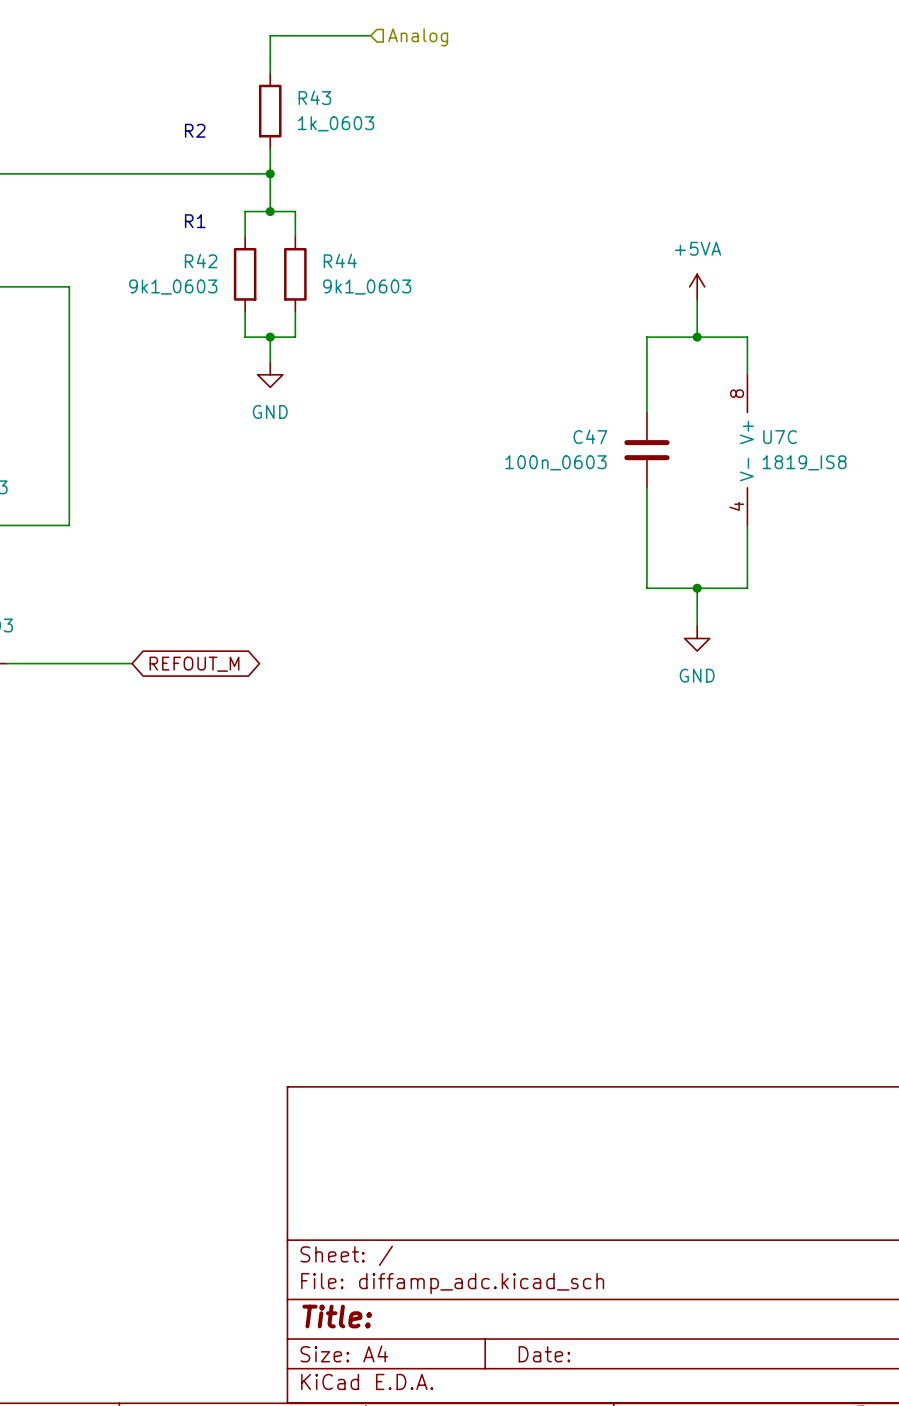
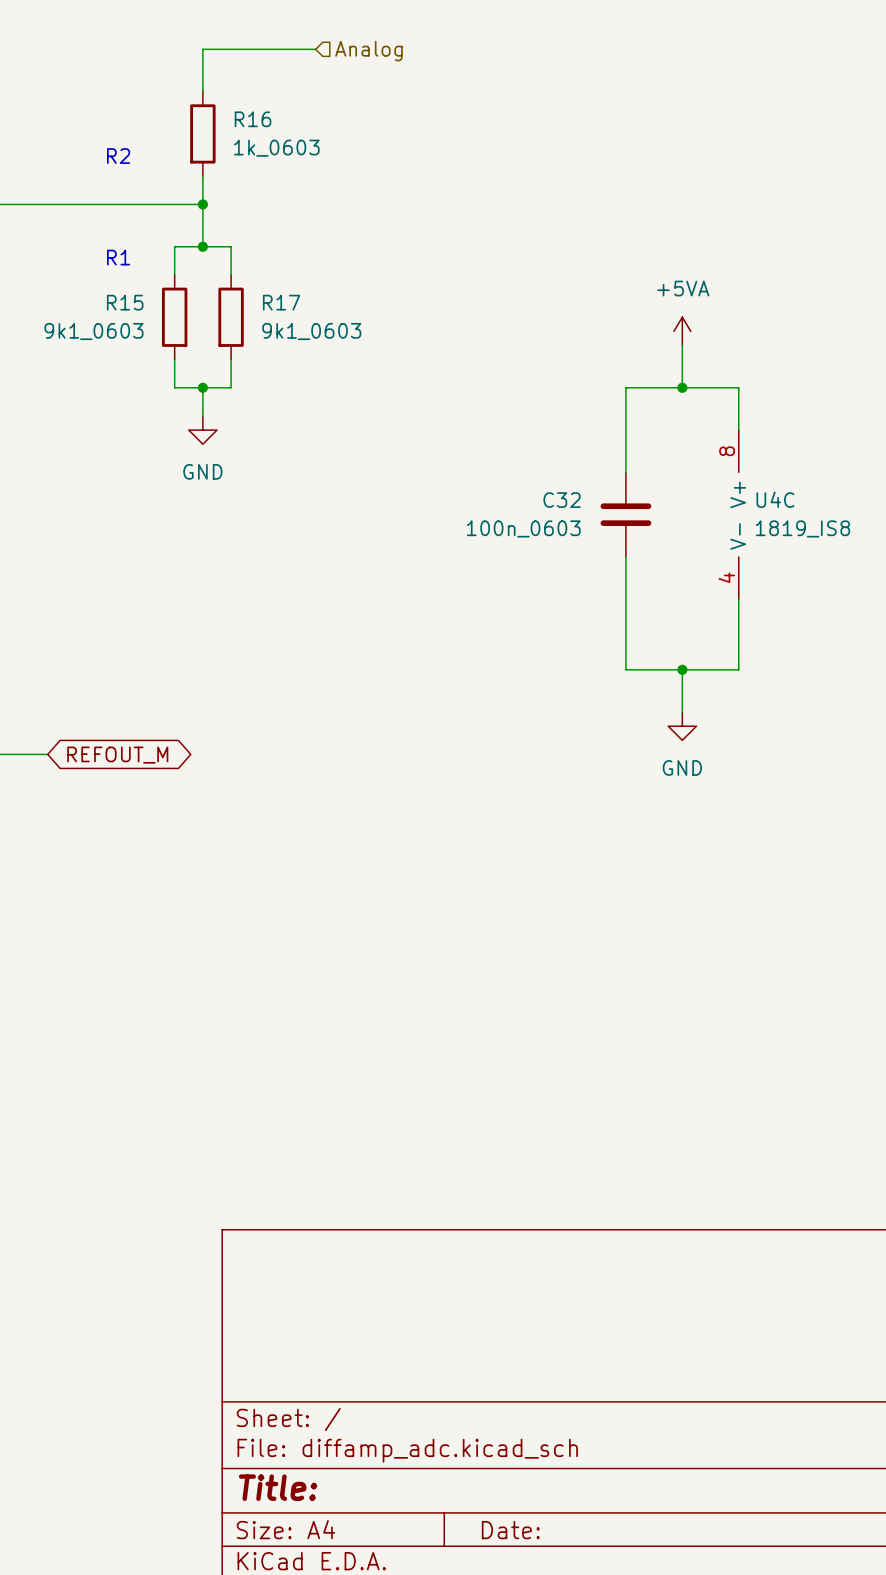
R43 name: R43 (314, 97) -> R16 (253, 119)
R42 name: R42 (201, 261) -> R15 (125, 302)
R44 name: R44 (340, 261) -> R17 (281, 302)
C47 name: C47 (590, 436) -> C32 (562, 500)
U7C name: U7C (780, 437) -> U4C (775, 499)

